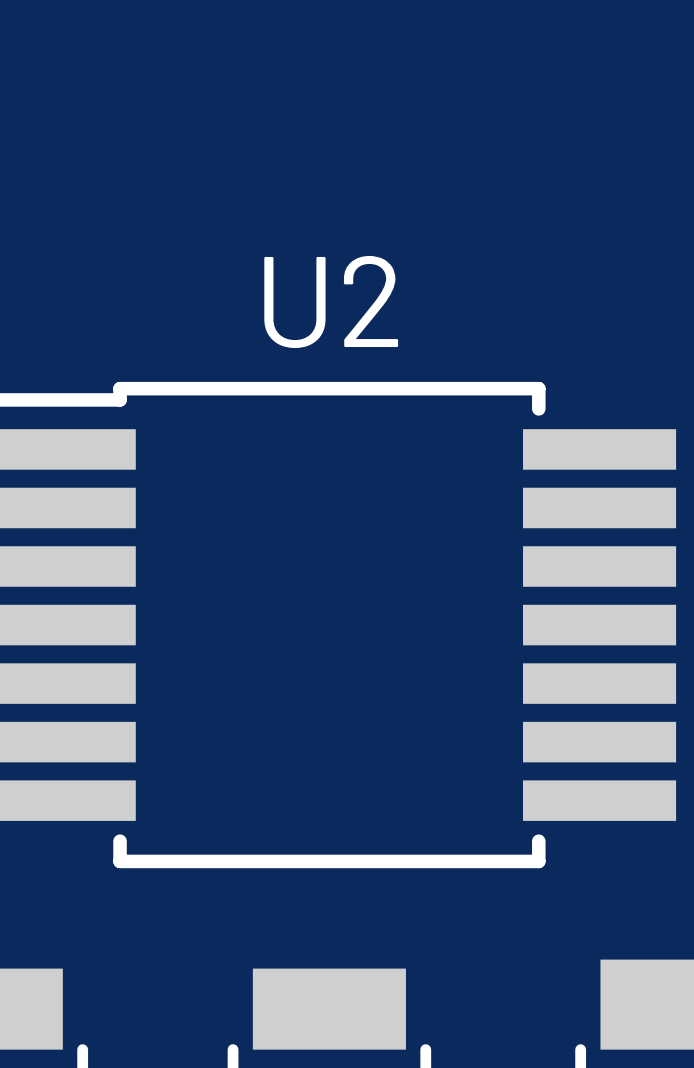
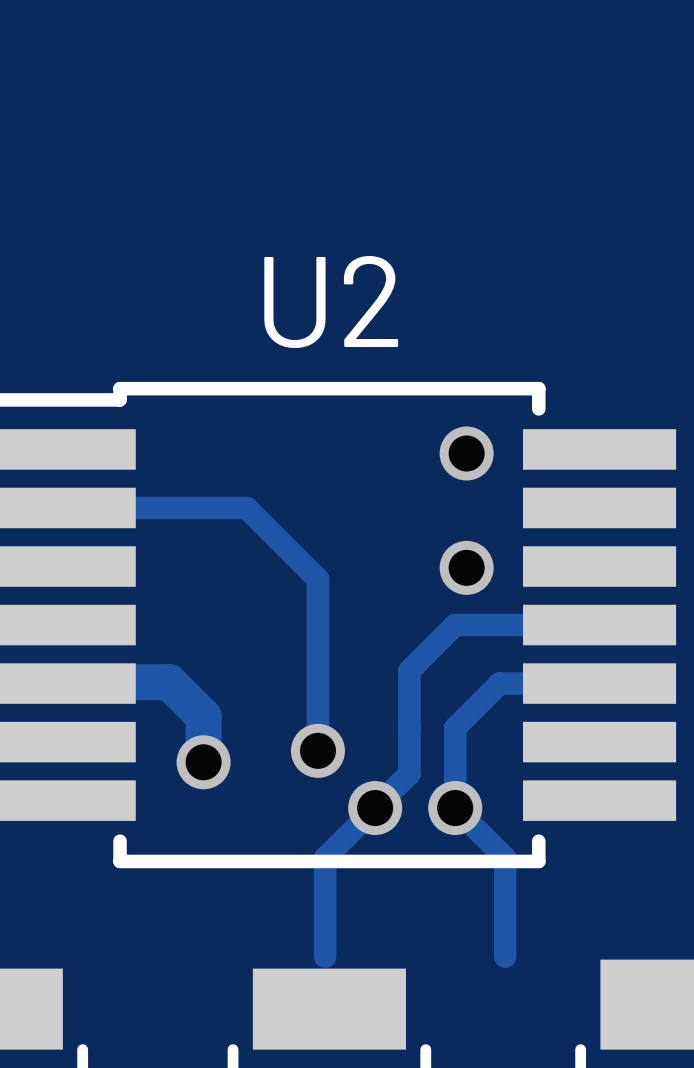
via: none -> (466, 453)
track: none -> (59, 507) (246, 507) (317, 579) (317, 750)
via: none -> (466, 567)
track: none -> (599, 625) (455, 625) (409, 670) (409, 773) (325, 858) (325, 956)
track: none -> (59, 683) (169, 682) (203, 716) (203, 762)
track: none -> (599, 683) (499, 683) (455, 727) (455, 808) (505, 858) (505, 956)
via: none -> (317, 750)
via: none -> (203, 762)
via: none -> (375, 808)
via: none -> (455, 808)

